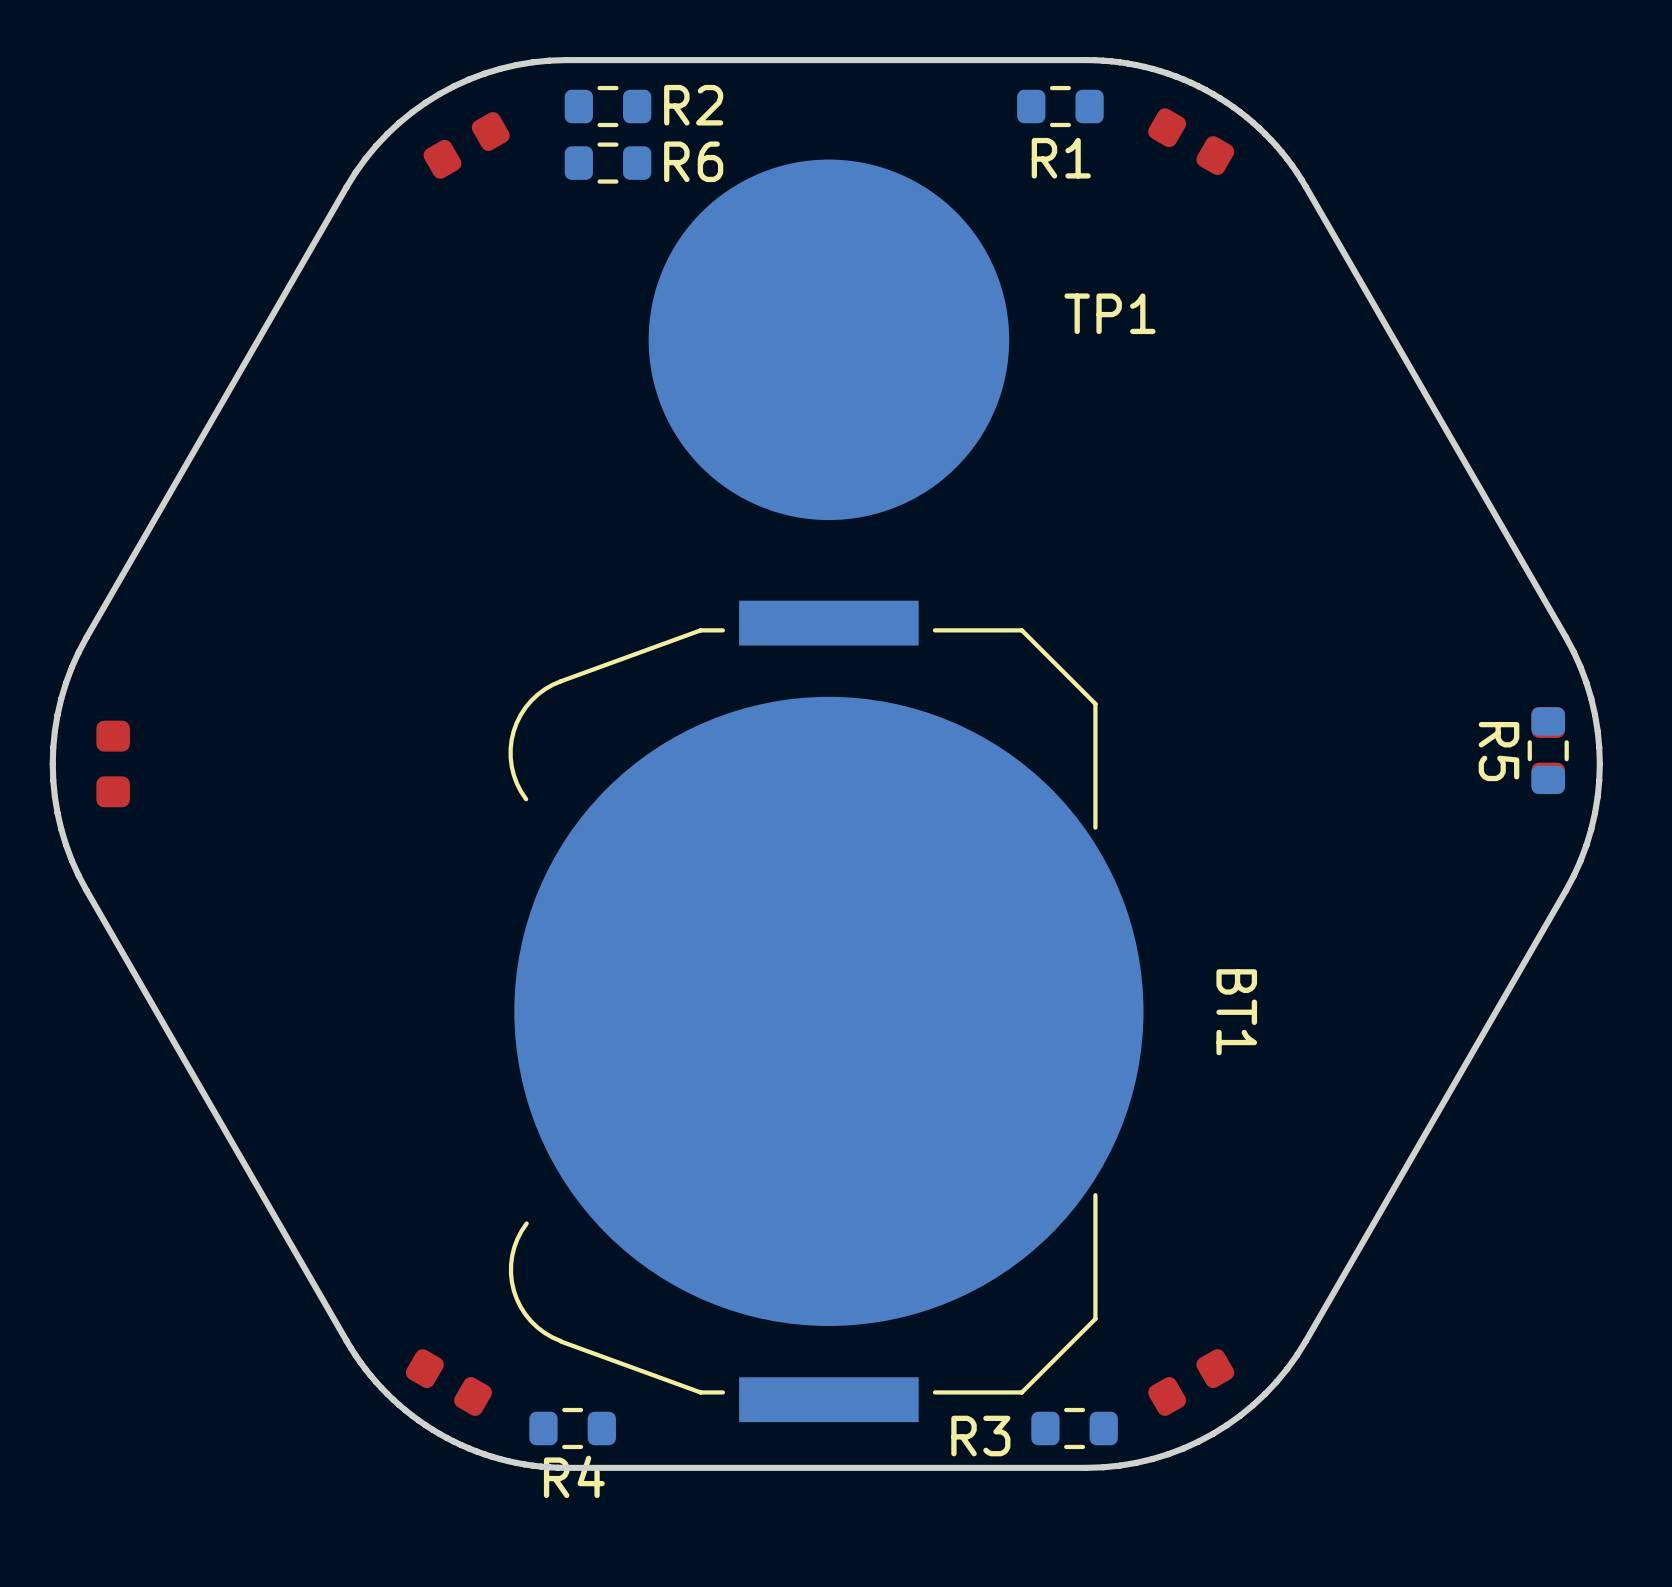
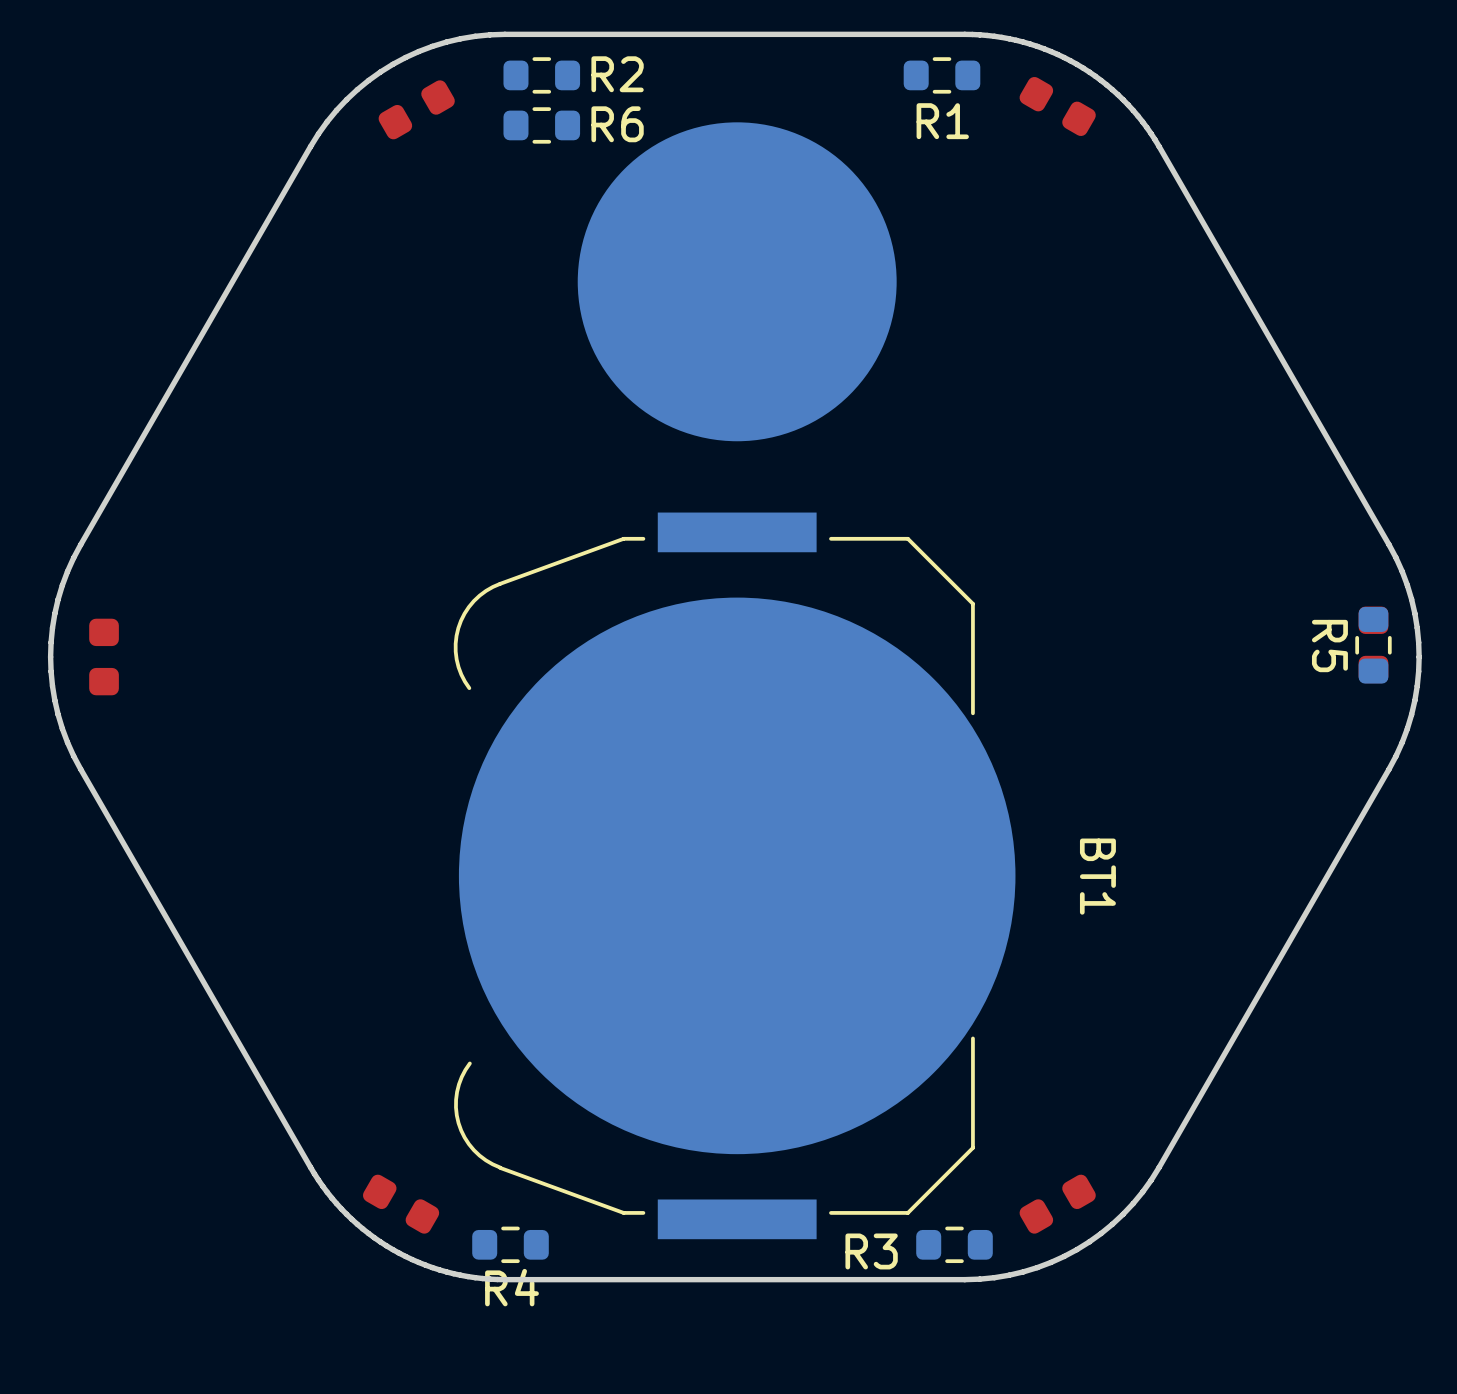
TP1 name: TP1 (1110, 313) -> none

